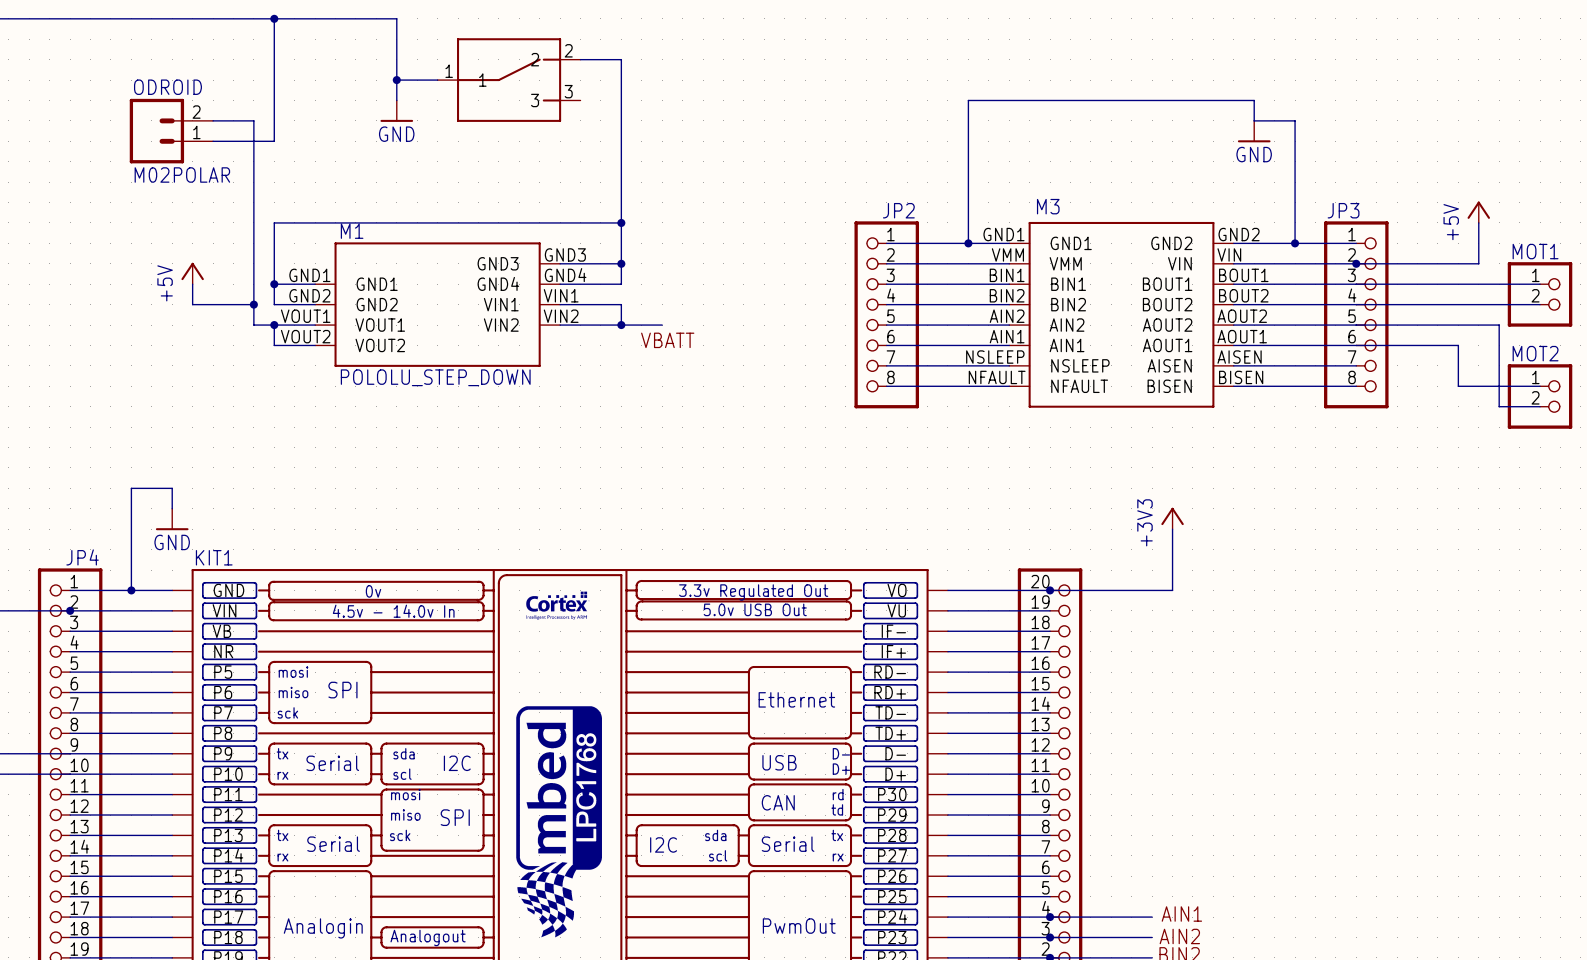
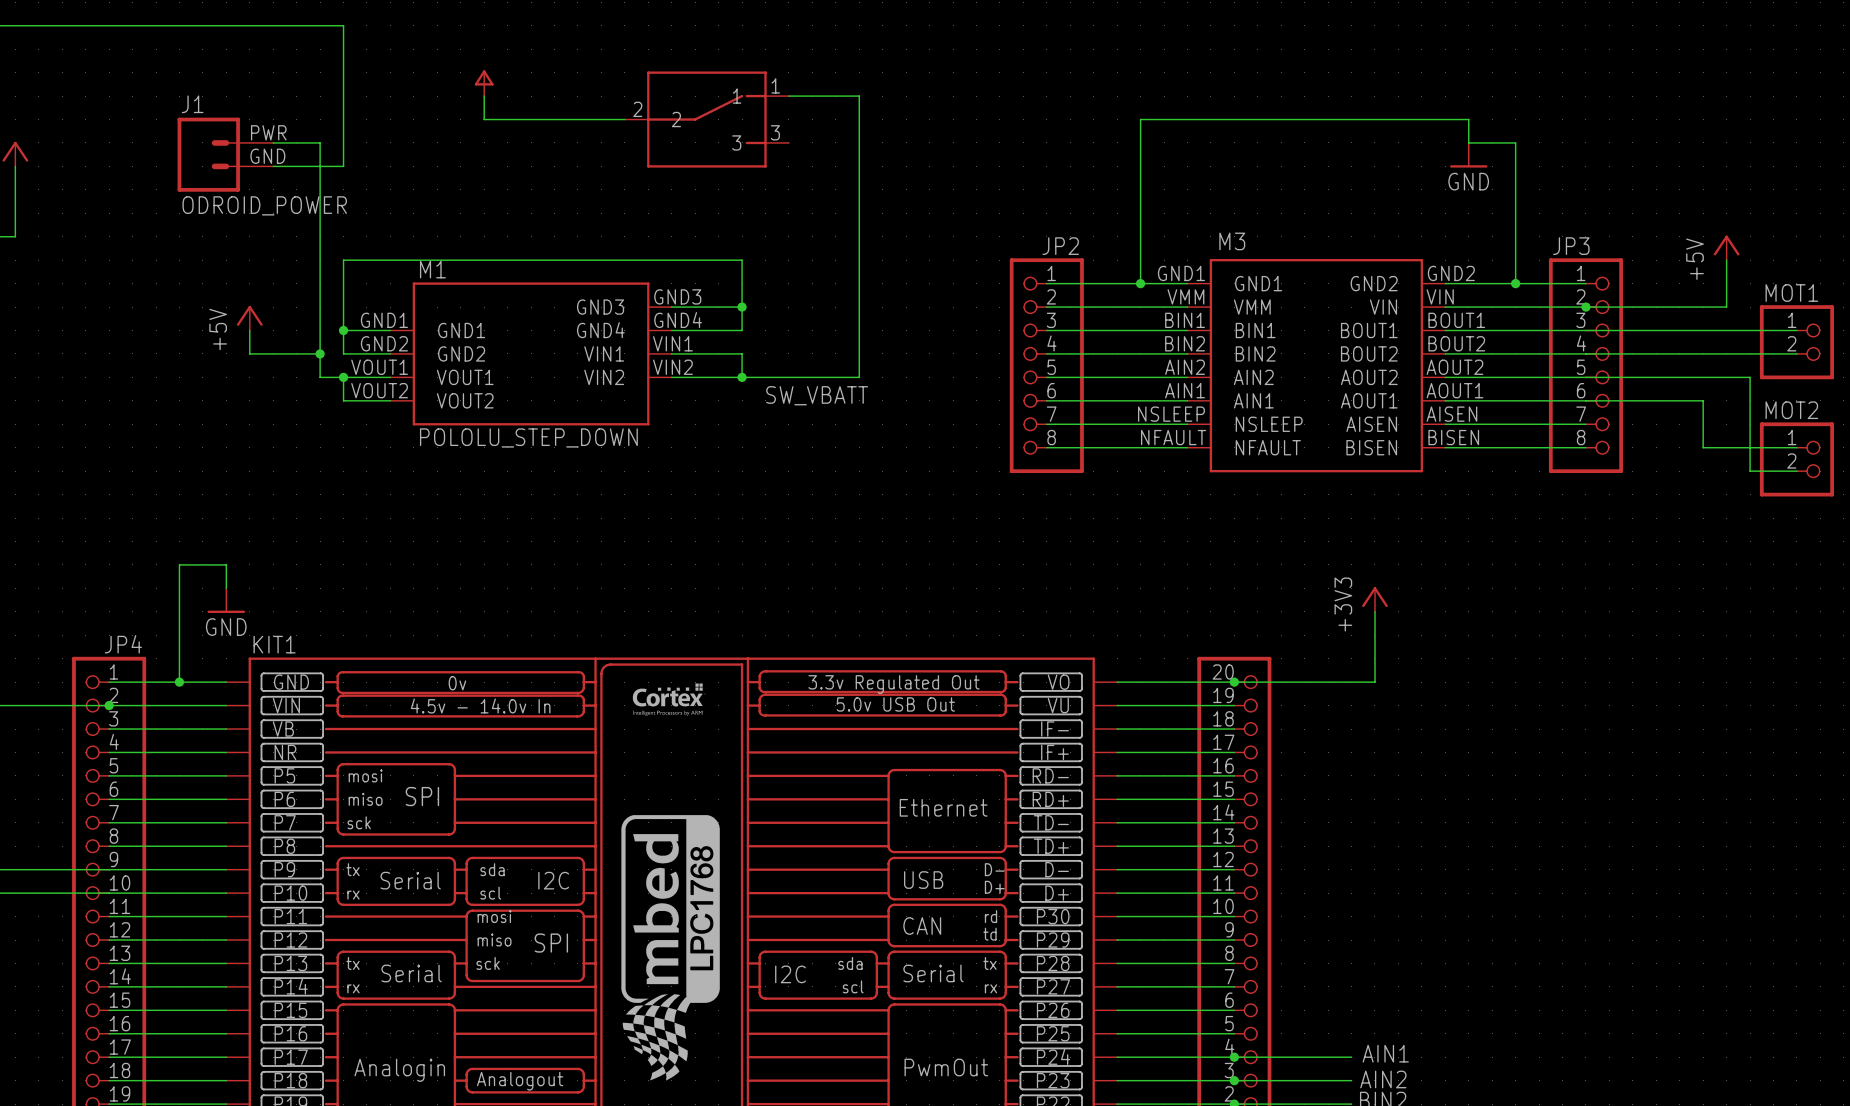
wire: (274, 18) (396, 18) (396, 80) (437, 80) -> none
junction: (274, 18) -> none
wire: (580, 59) (621, 59) (621, 222) -> none
power symbol: none -> (484, 83)
junction: (396, 80) -> none
part: (509, 80) -> none
wire: none -> (788, 96) (859, 96) (859, 377) (788, 377)
ODROID name: ODROID (167, 87) -> J1 (192, 104)
wire: none -> (484, 119) (624, 119)
part: none -> (706, 119)
power symbol: GND (396, 111) -> none
ODROID pin number: 2 (196, 112) -> PWR (268, 132)
ODROID pin number: 1 (196, 132) -> GND (267, 156)
ODROID value: M02POLAR (182, 174) -> ODROID_POWER (264, 205)
junction: (621, 222) -> none
label: VBATT (667, 340) -> SW_VBATT (817, 395)

